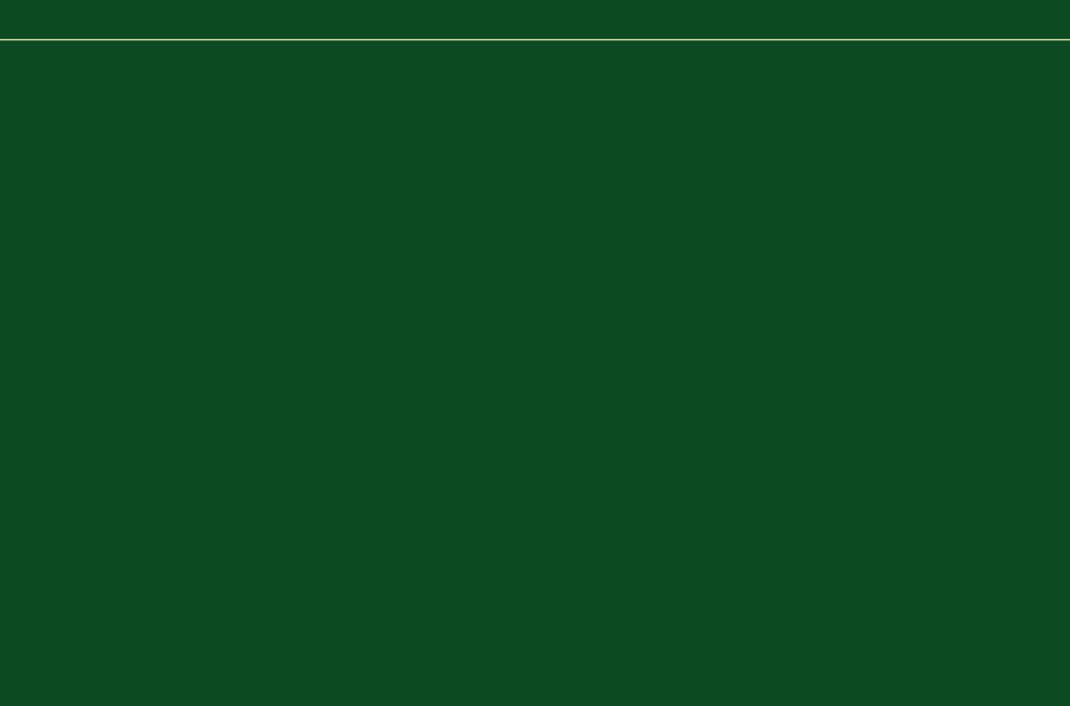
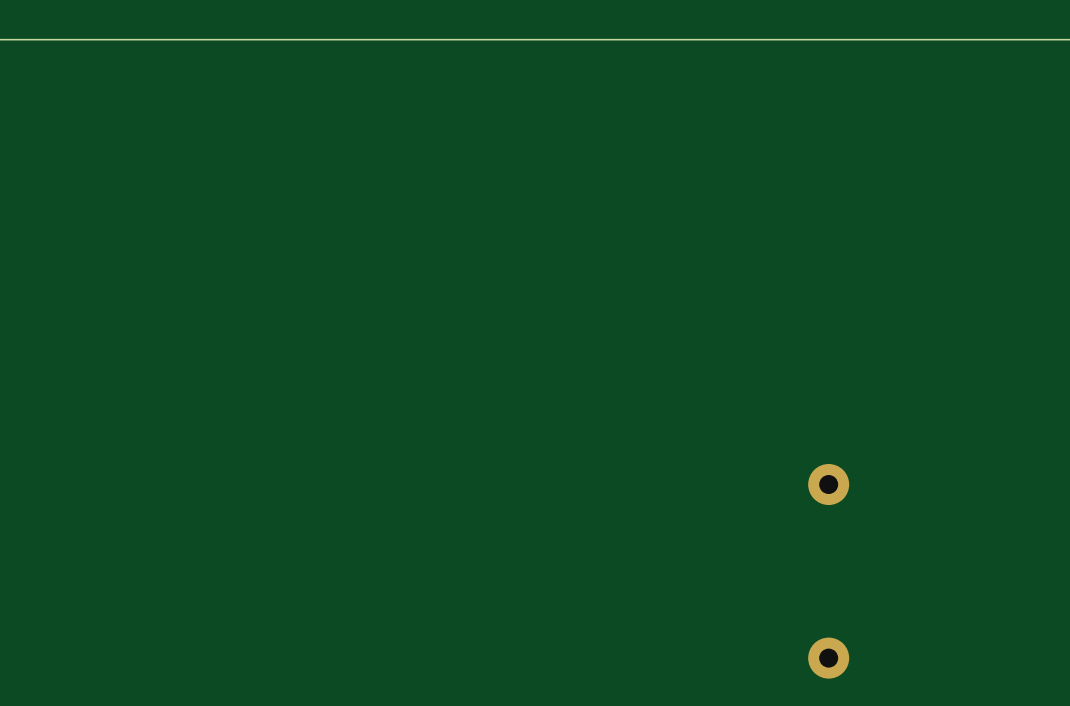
via: none -> (828, 484)
via: none -> (828, 658)

